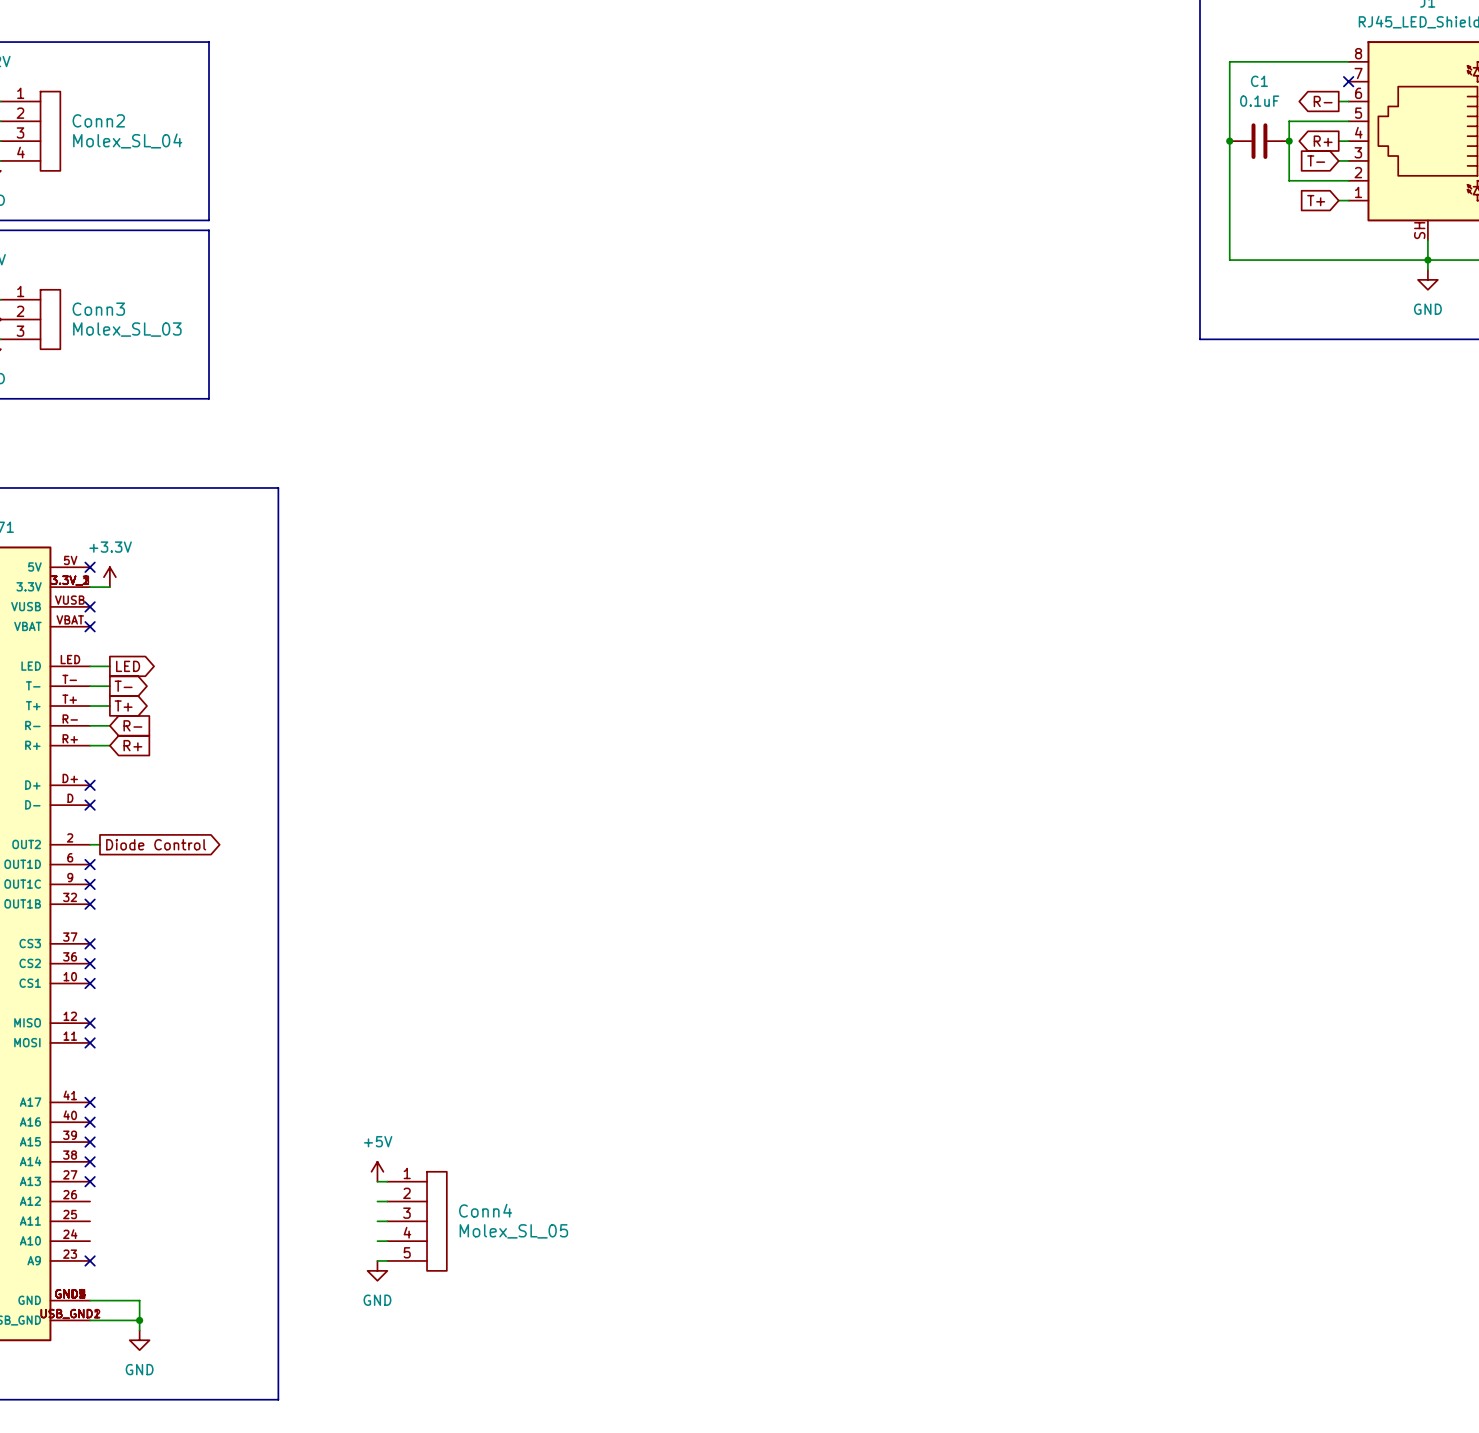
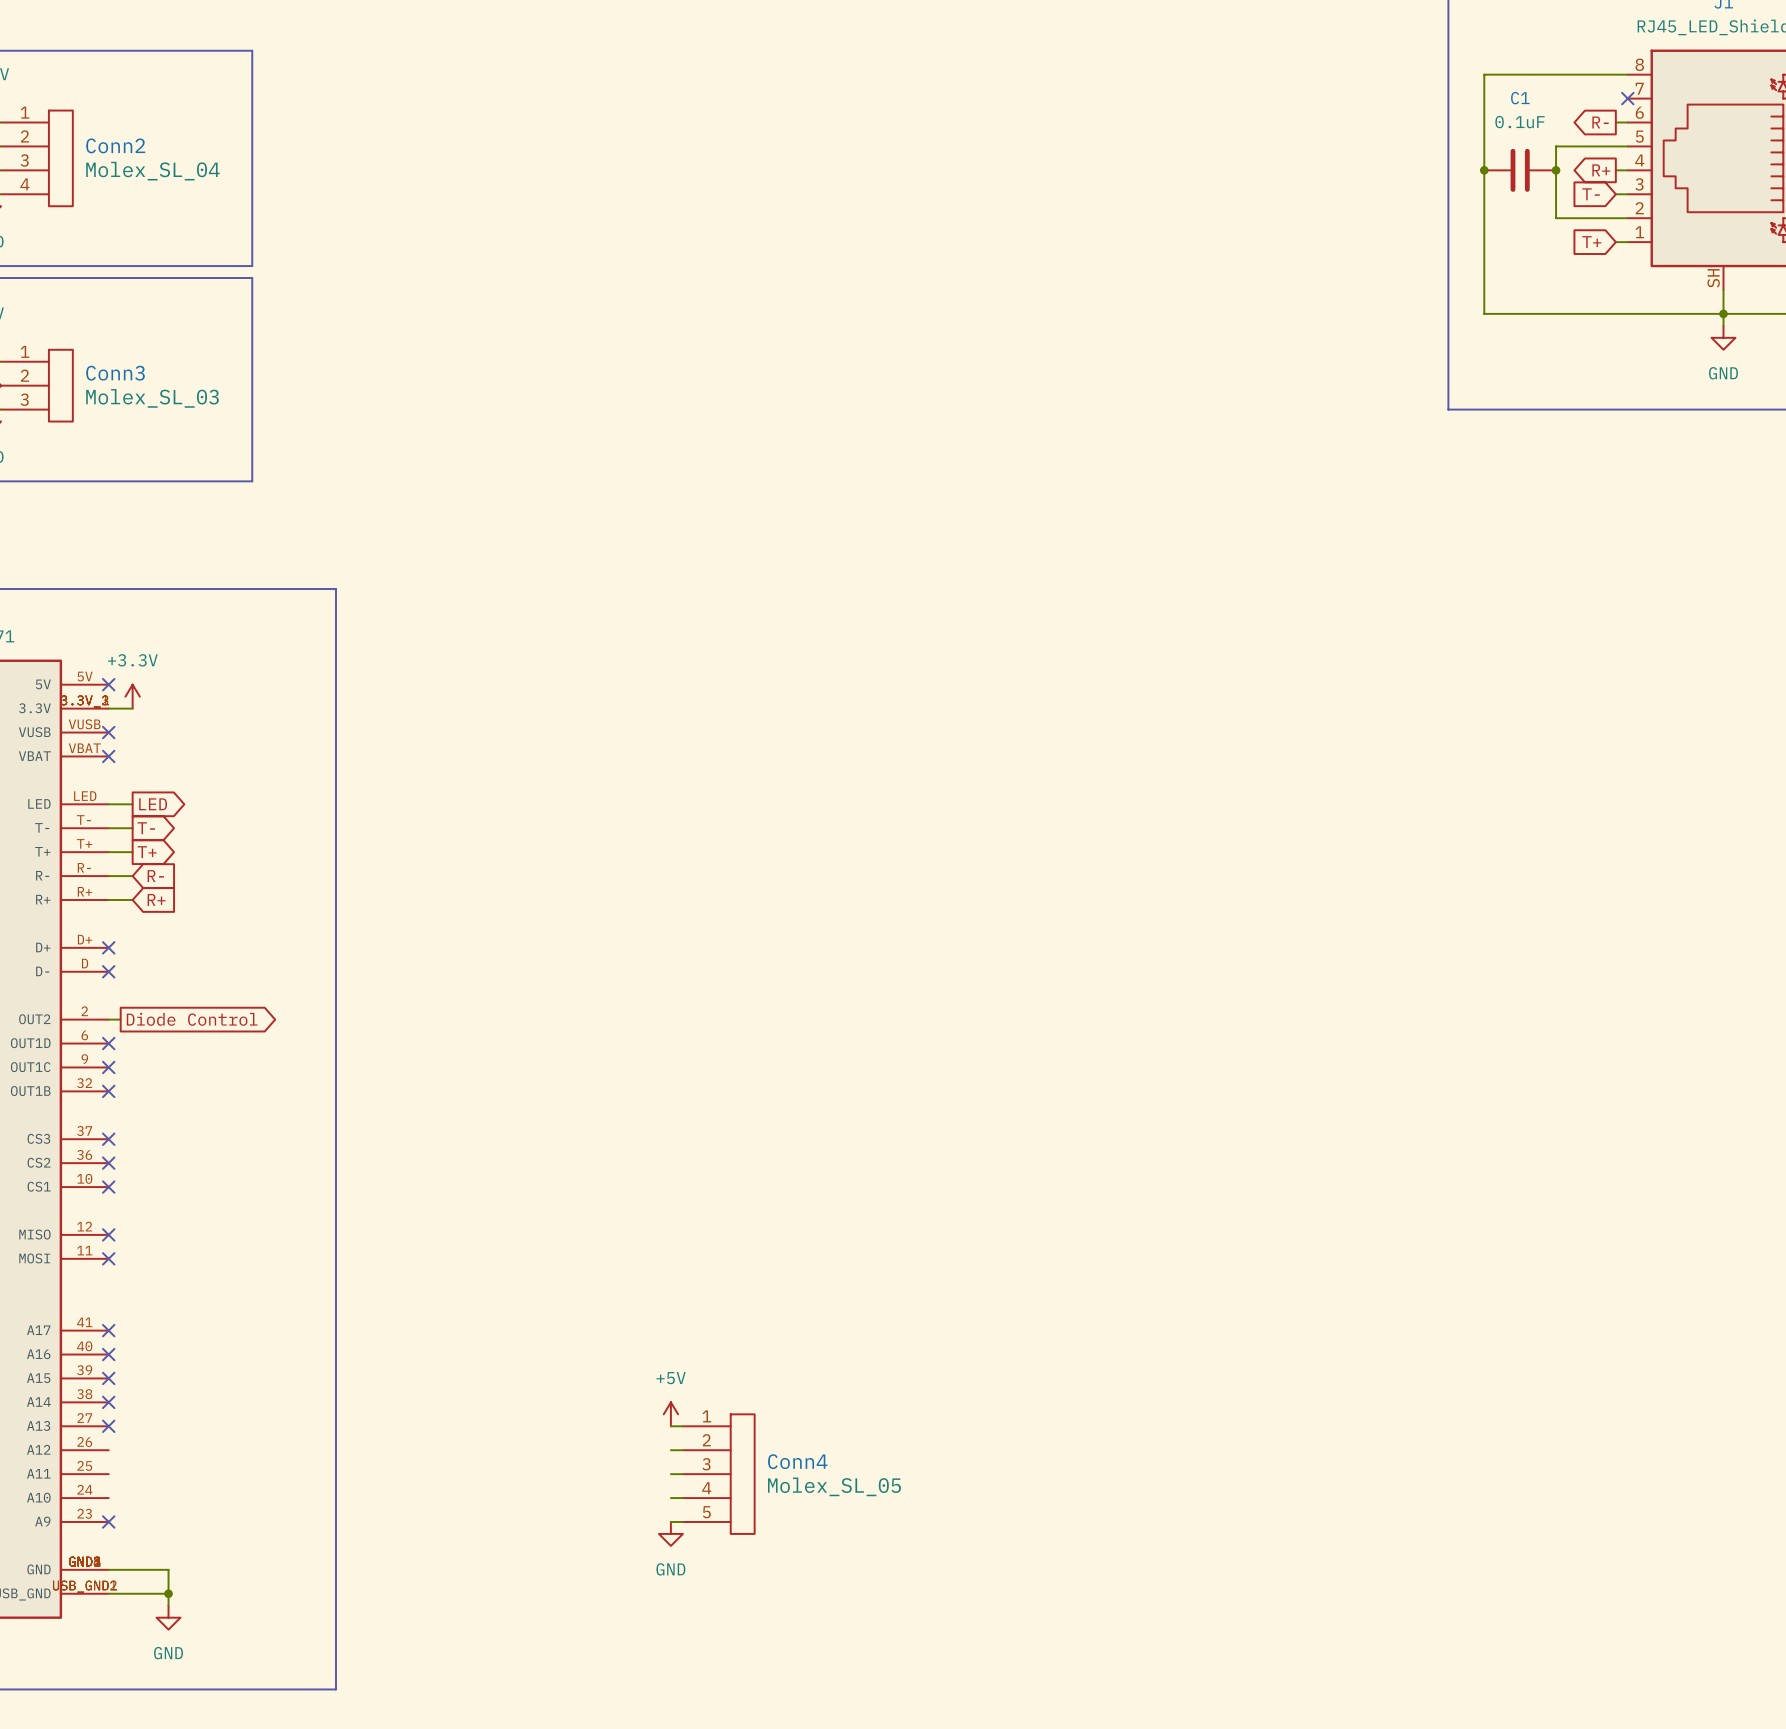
power symbol position: +5V (377, 1171) -> +5V (670, 1414)
wire: (377, 1181) (387, 1181) -> (670, 1426) (682, 1426)
wire: (377, 1201) (387, 1201) -> (670, 1450) (682, 1450)
wire: (377, 1221) (387, 1221) -> (670, 1474) (682, 1474)
Conn4 position: (417, 1221) -> (718, 1474)
wire: (377, 1241) (387, 1241) -> (670, 1498) (682, 1498)
wire: (377, 1260) (387, 1260) -> (670, 1521) (682, 1521)
power symbol position: GND (377, 1270) -> GND (670, 1533)

